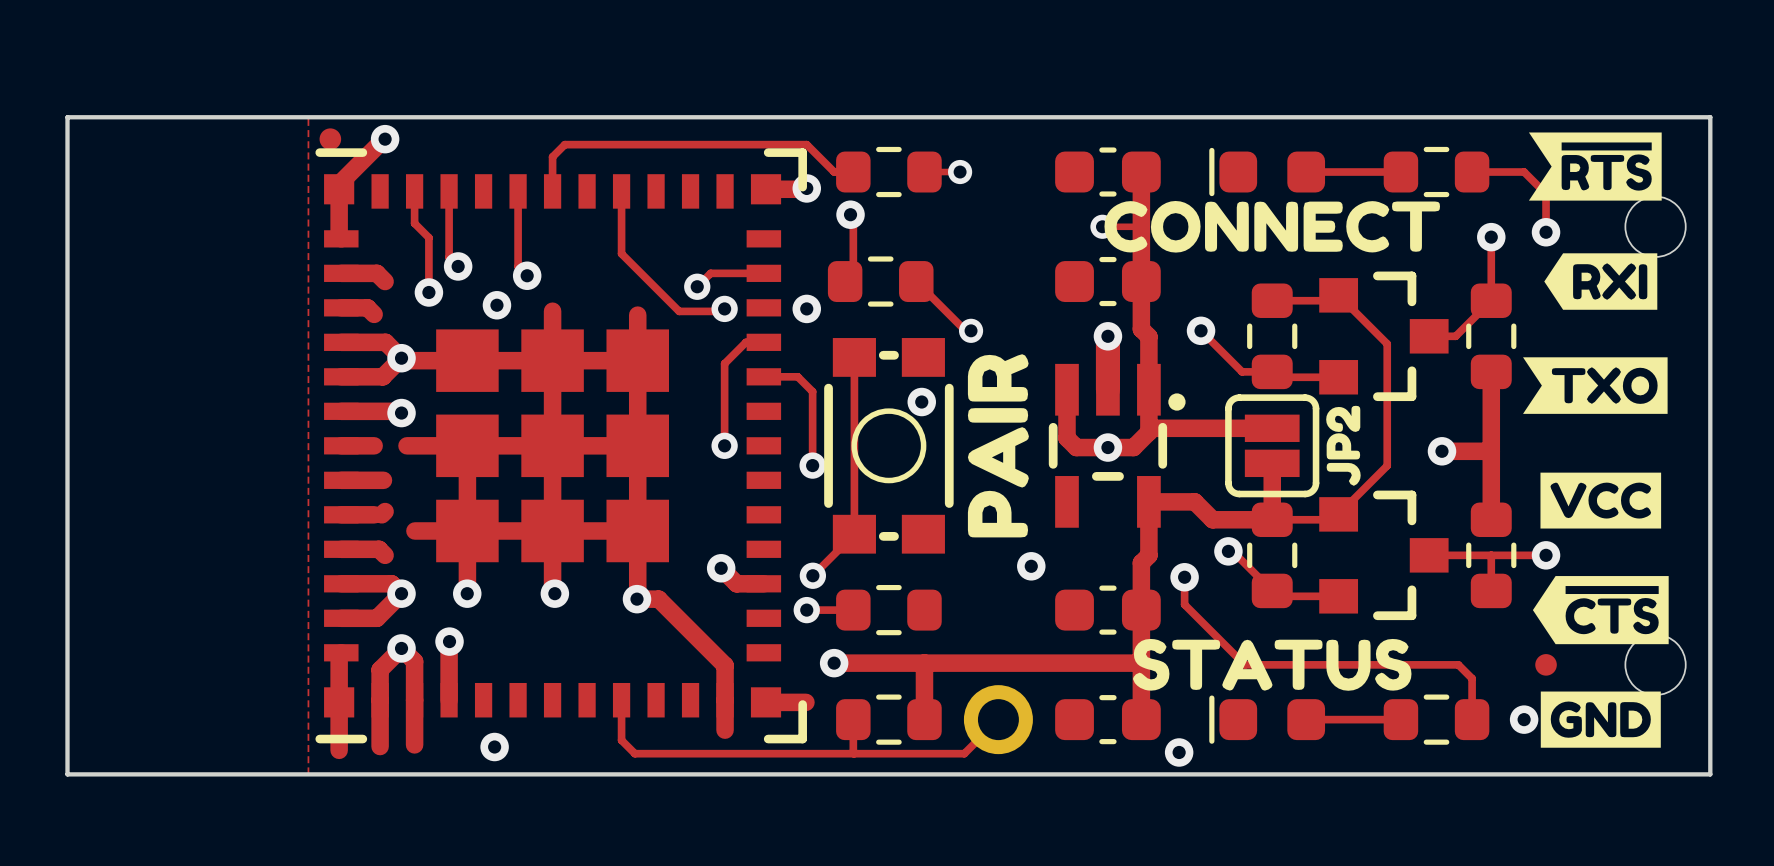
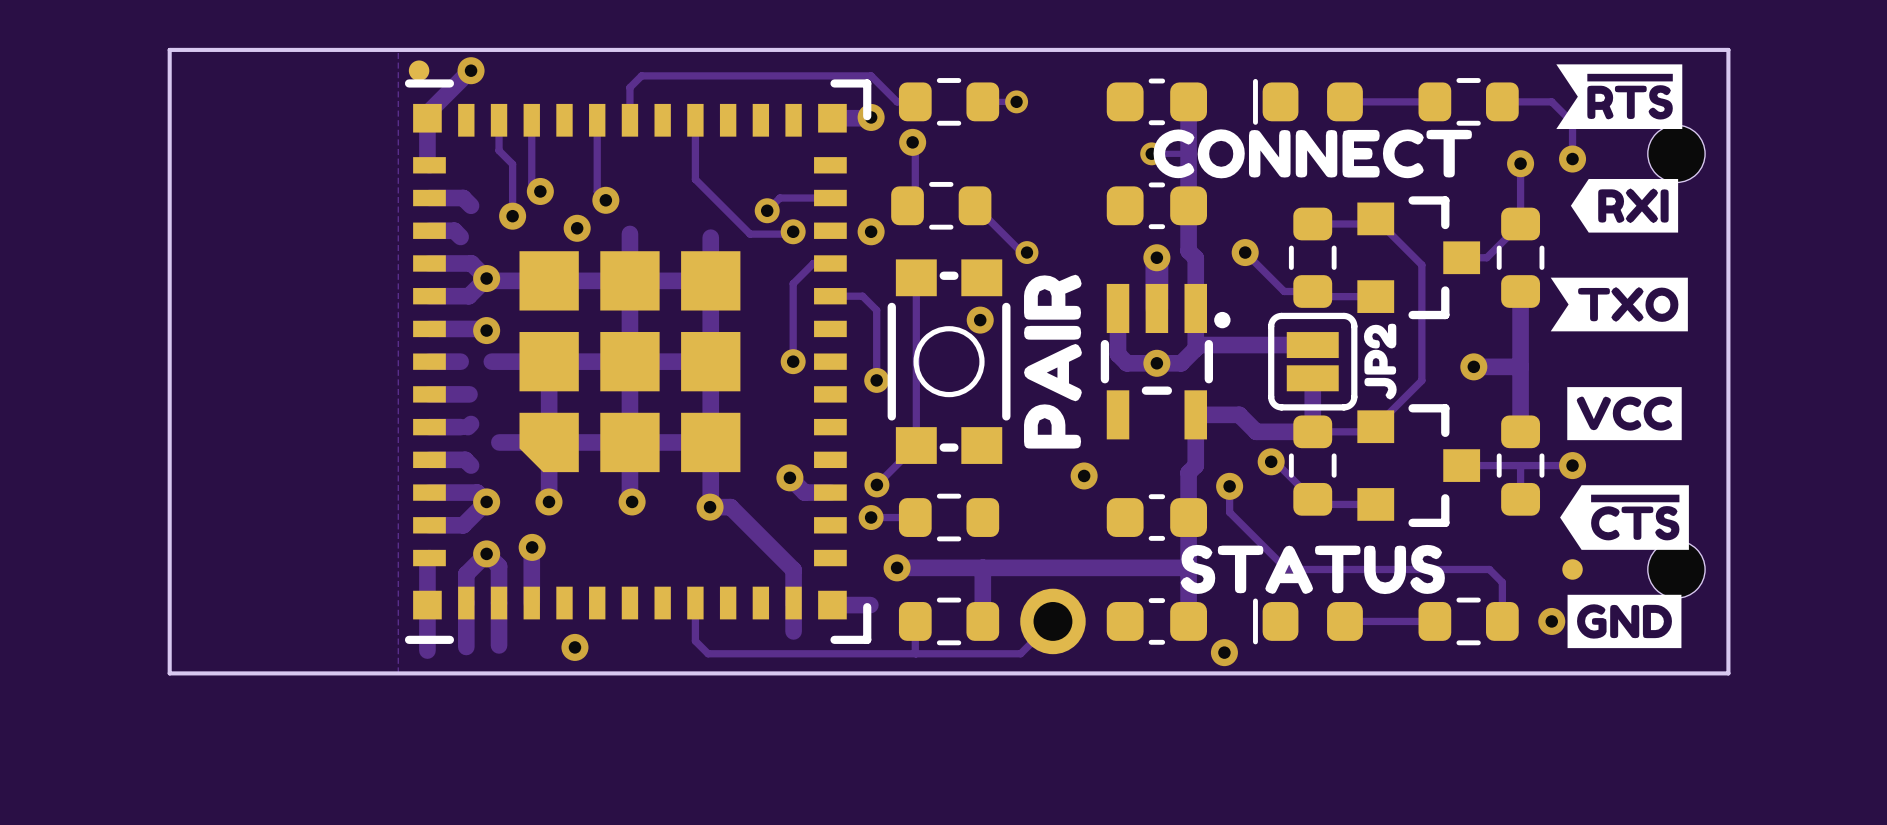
part footprint: [315, 148, 807, 744] -> [404, 79, 872, 644]

